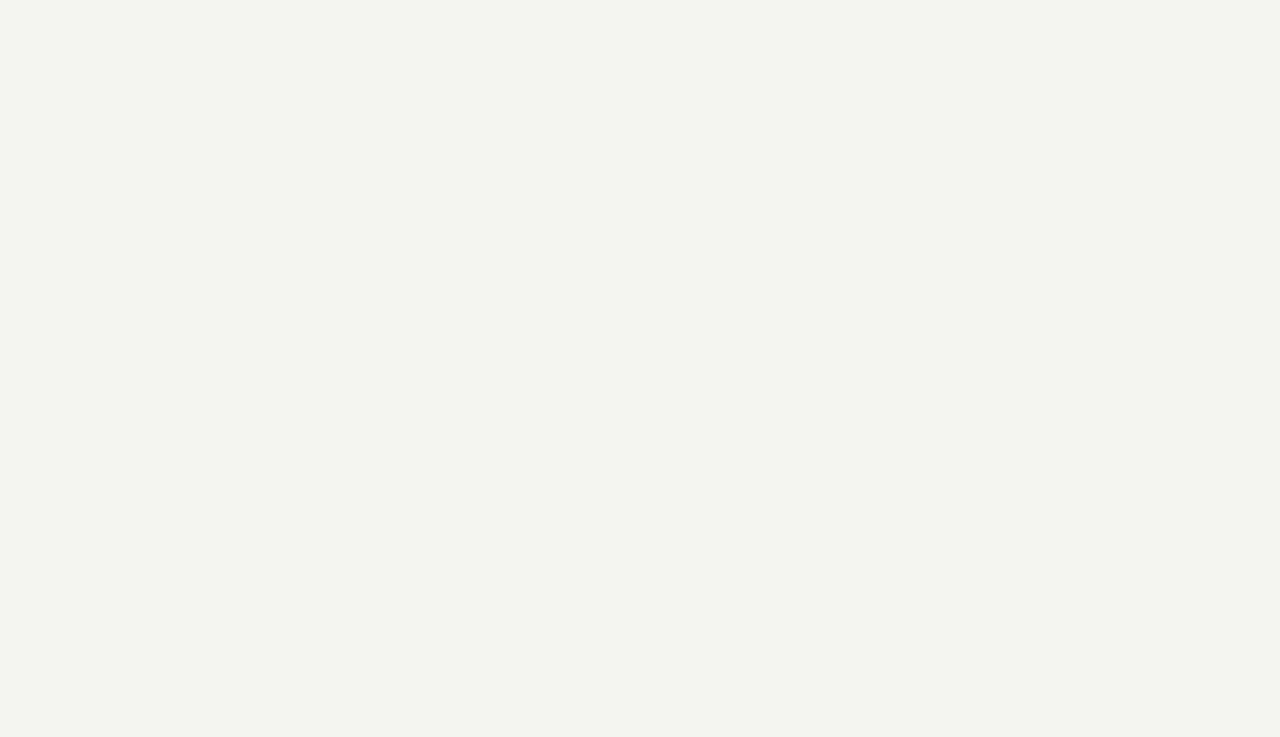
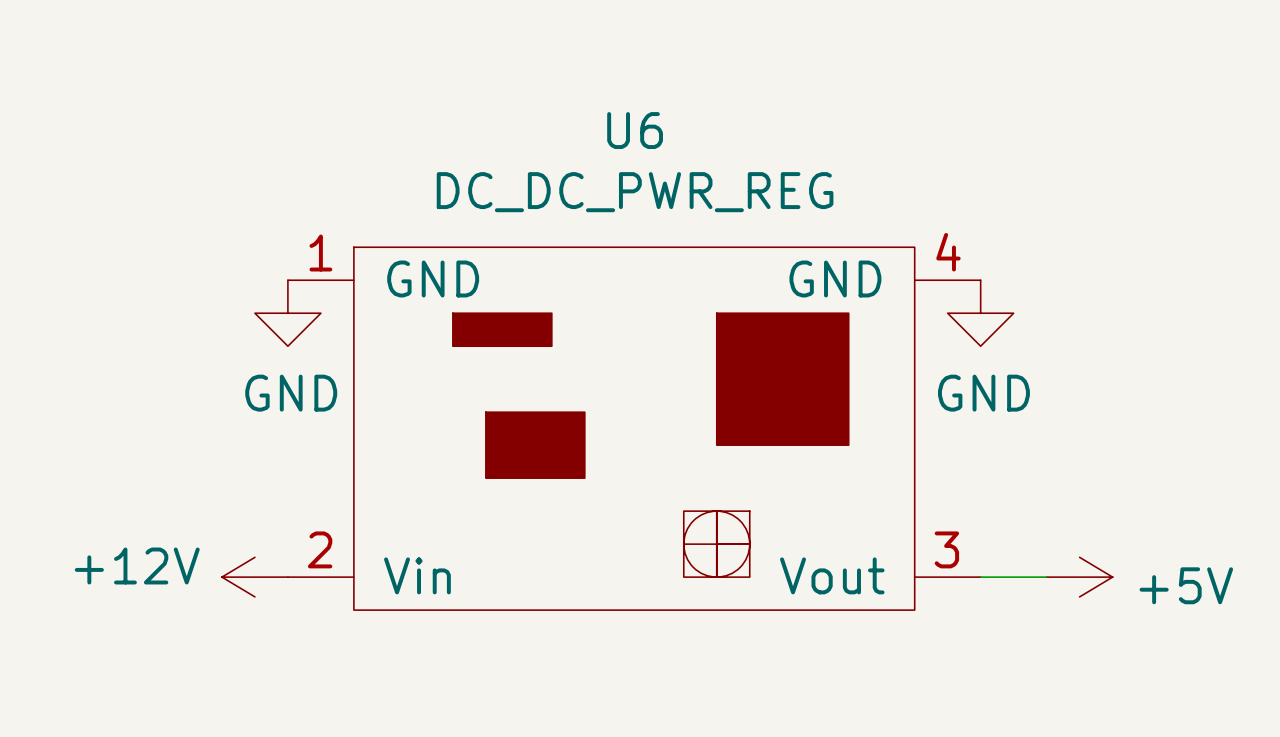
power symbol: none -> GND (287, 313)
power symbol: none -> GND (980, 313)
U6: none -> DC_DC_PWR_REG (634, 428)
power symbol: none -> +12V (254, 577)
wire: none -> (980, 577) (1046, 577)
power symbol: none -> +5V (1079, 577)

